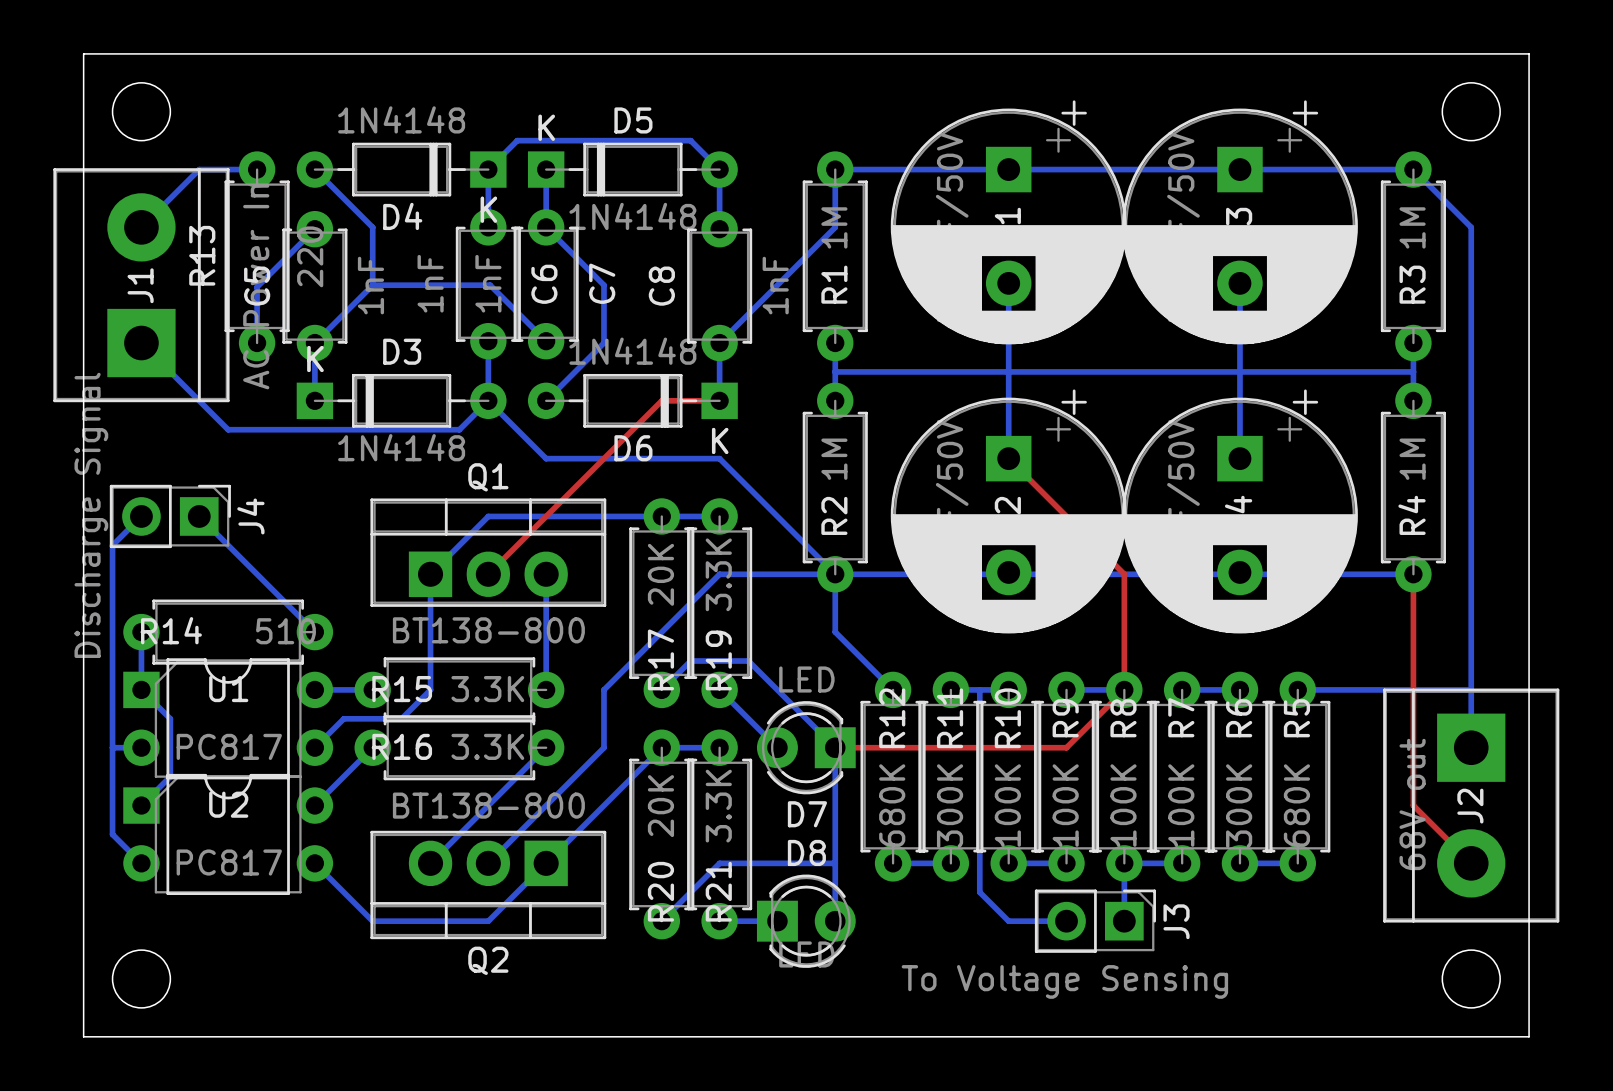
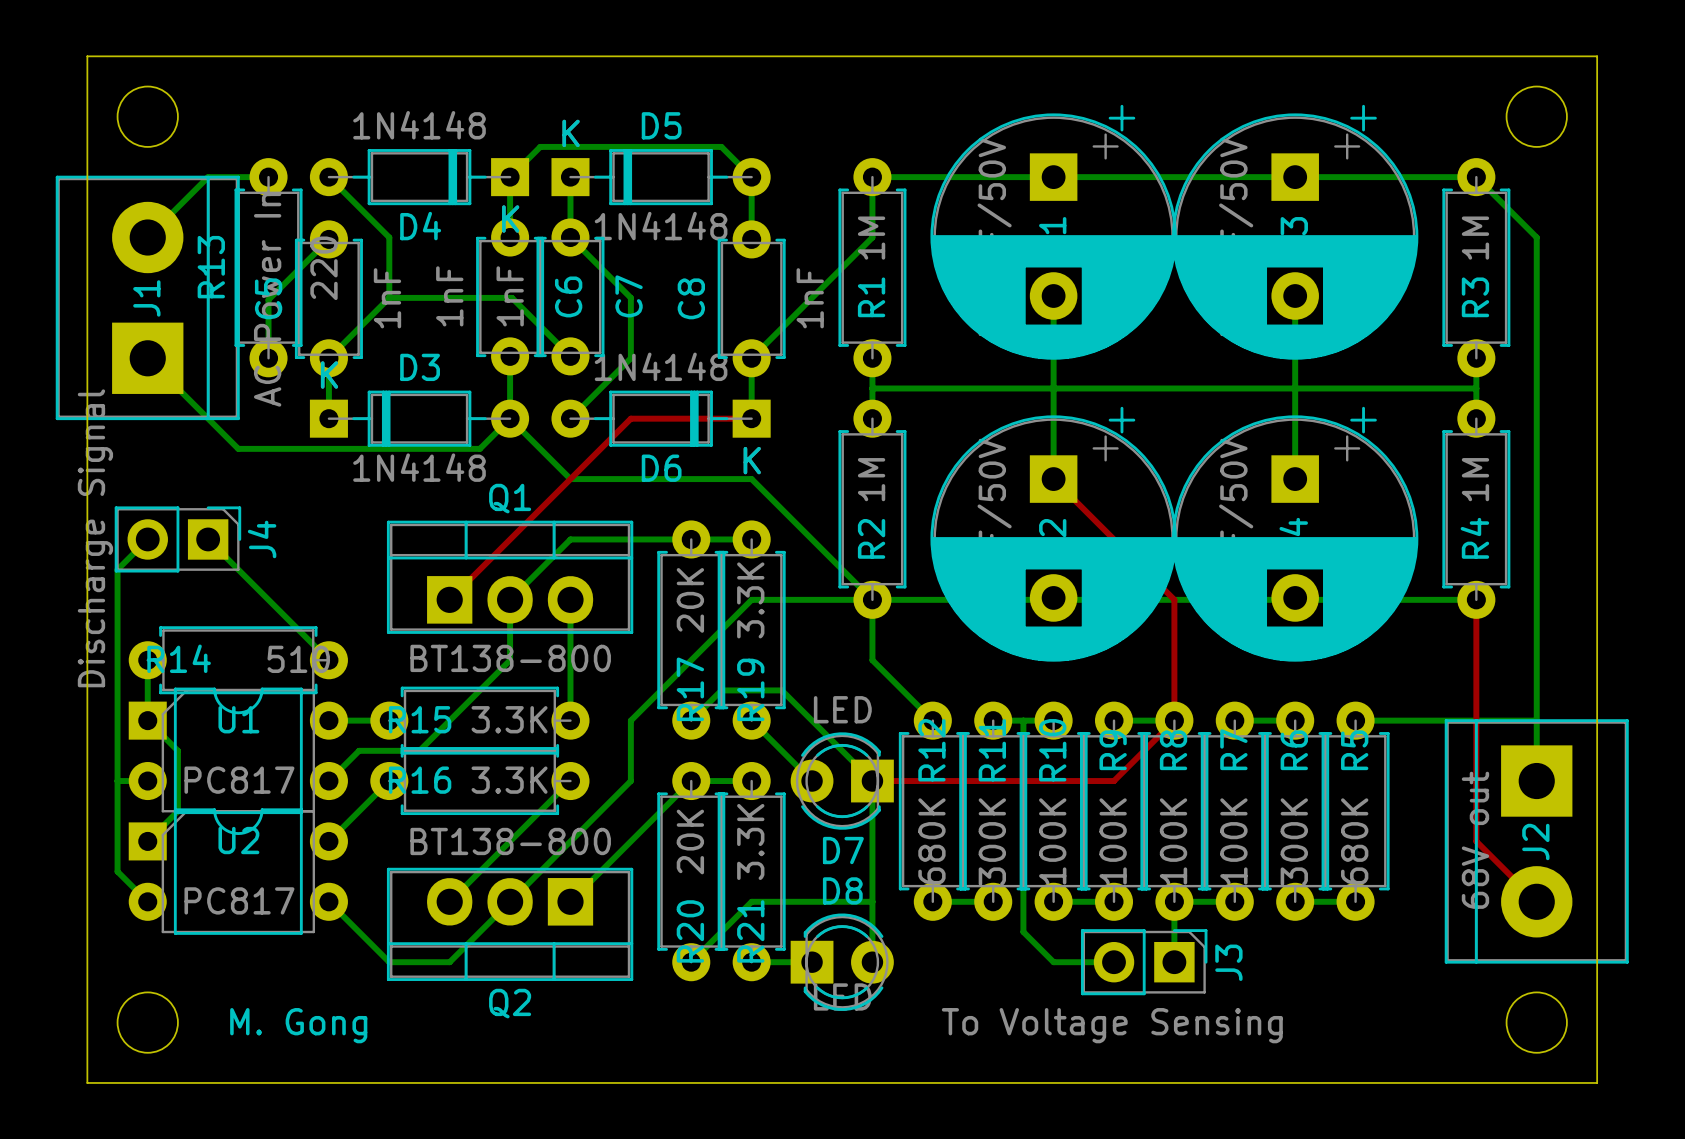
top track: (661, 400) (488, 574) -> (691, 418) (630, 418) (449, 599)
bottom track: (546, 516) (488, 516) (430, 574) (430, 689) -> (570, 539) (510, 599) (510, 660) (449, 720)
bottom track: (546, 863) (488, 921) (430, 921) -> (510, 901) (449, 962)
text: none -> M. Gong (298, 1025)

